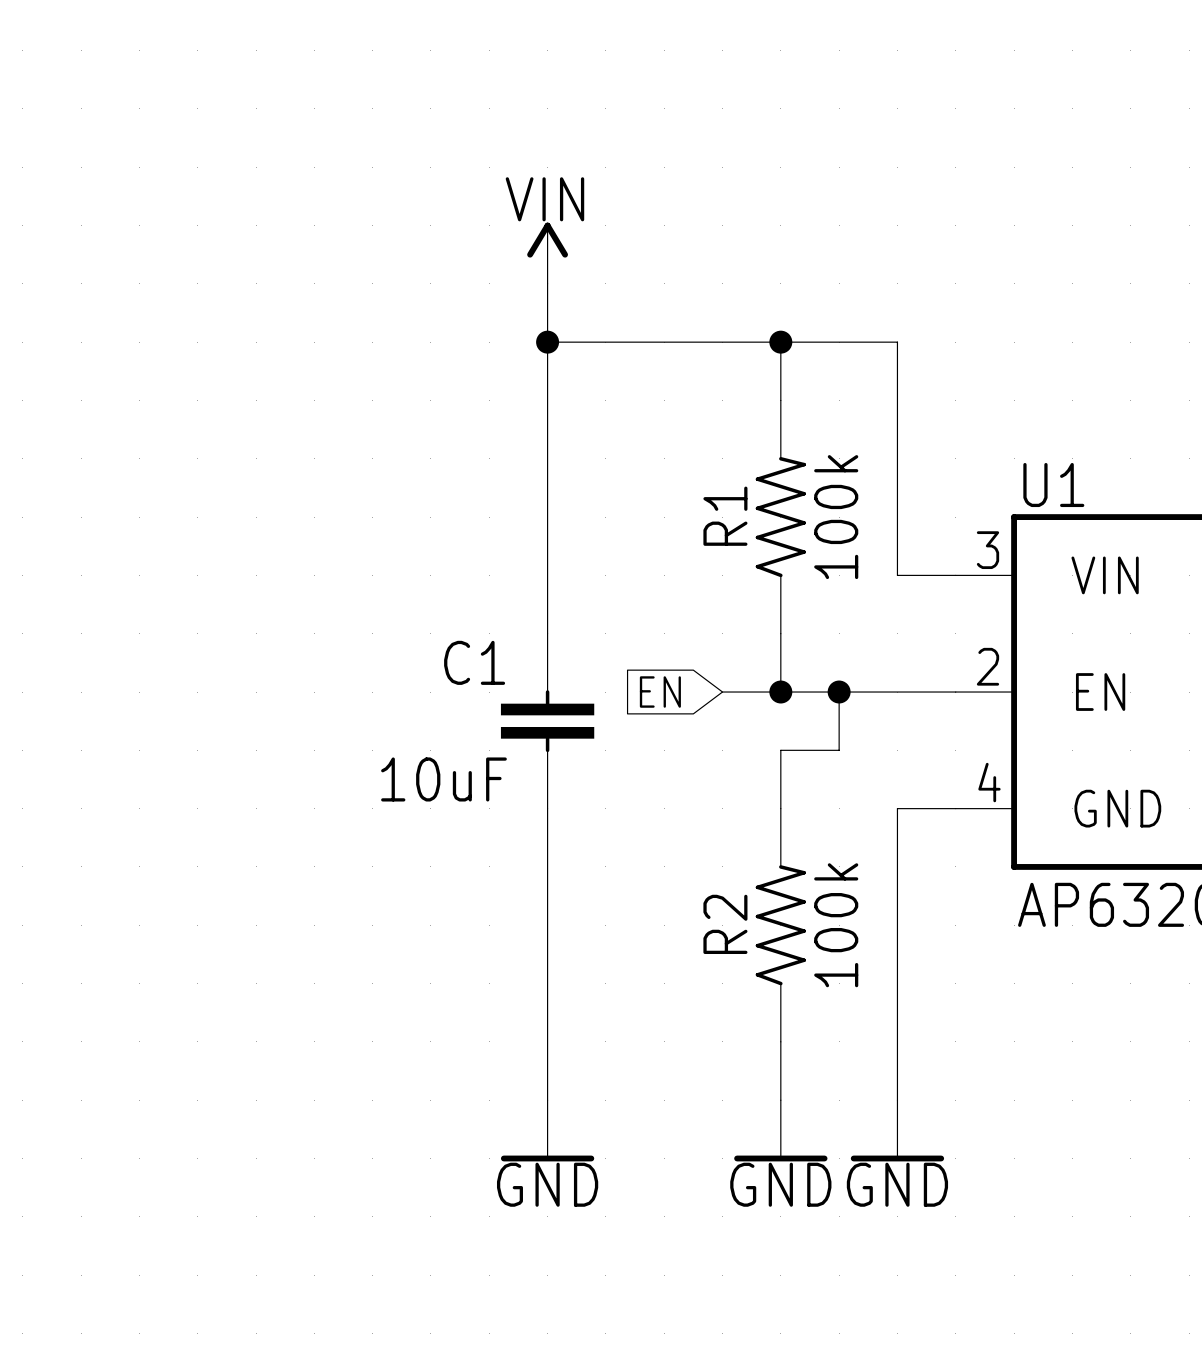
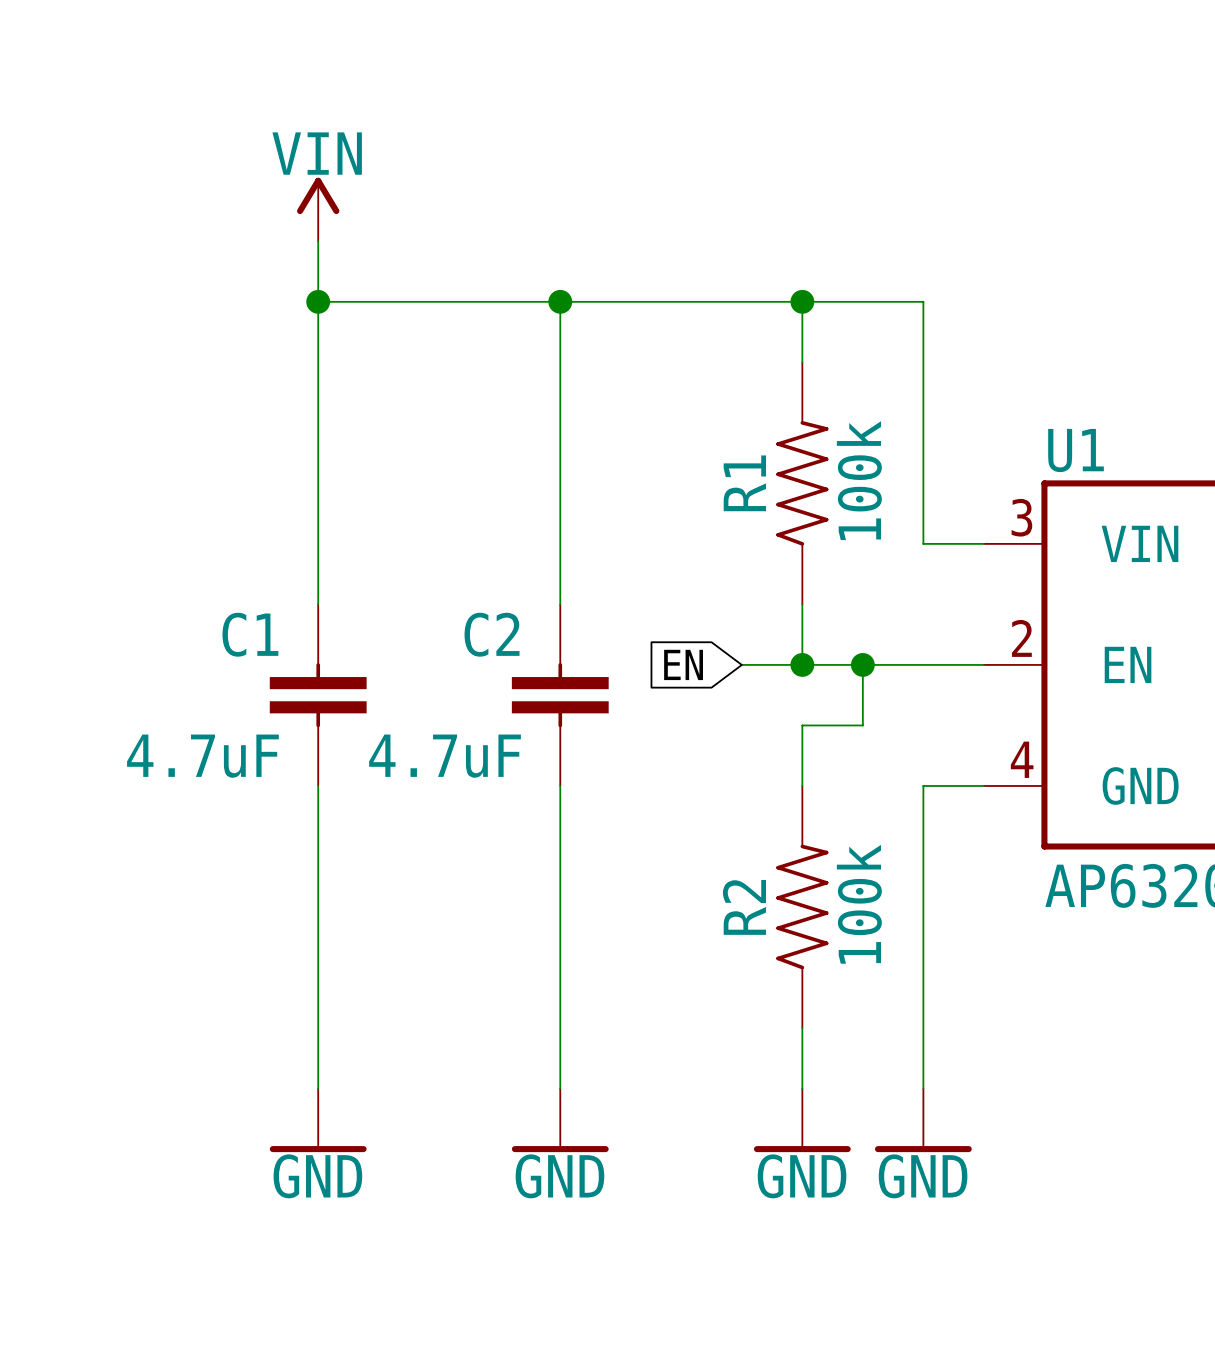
power symbol position: VIN (547, 253) -> VIN (318, 209)
wire: none -> (318, 241) (318, 604)
wire: (547, 283) (547, 342) -> (318, 301) (560, 301)
junction: none -> (318, 301)
C1 name: C1 (474, 662) -> C2 (492, 634)
C1: none -> 4.7uF (318, 695)
C1 value: 10uF (443, 779) -> 4.7uF (445, 756)
wire: none -> (318, 785) (318, 1088)
power symbol: none -> GND (318, 1120)

